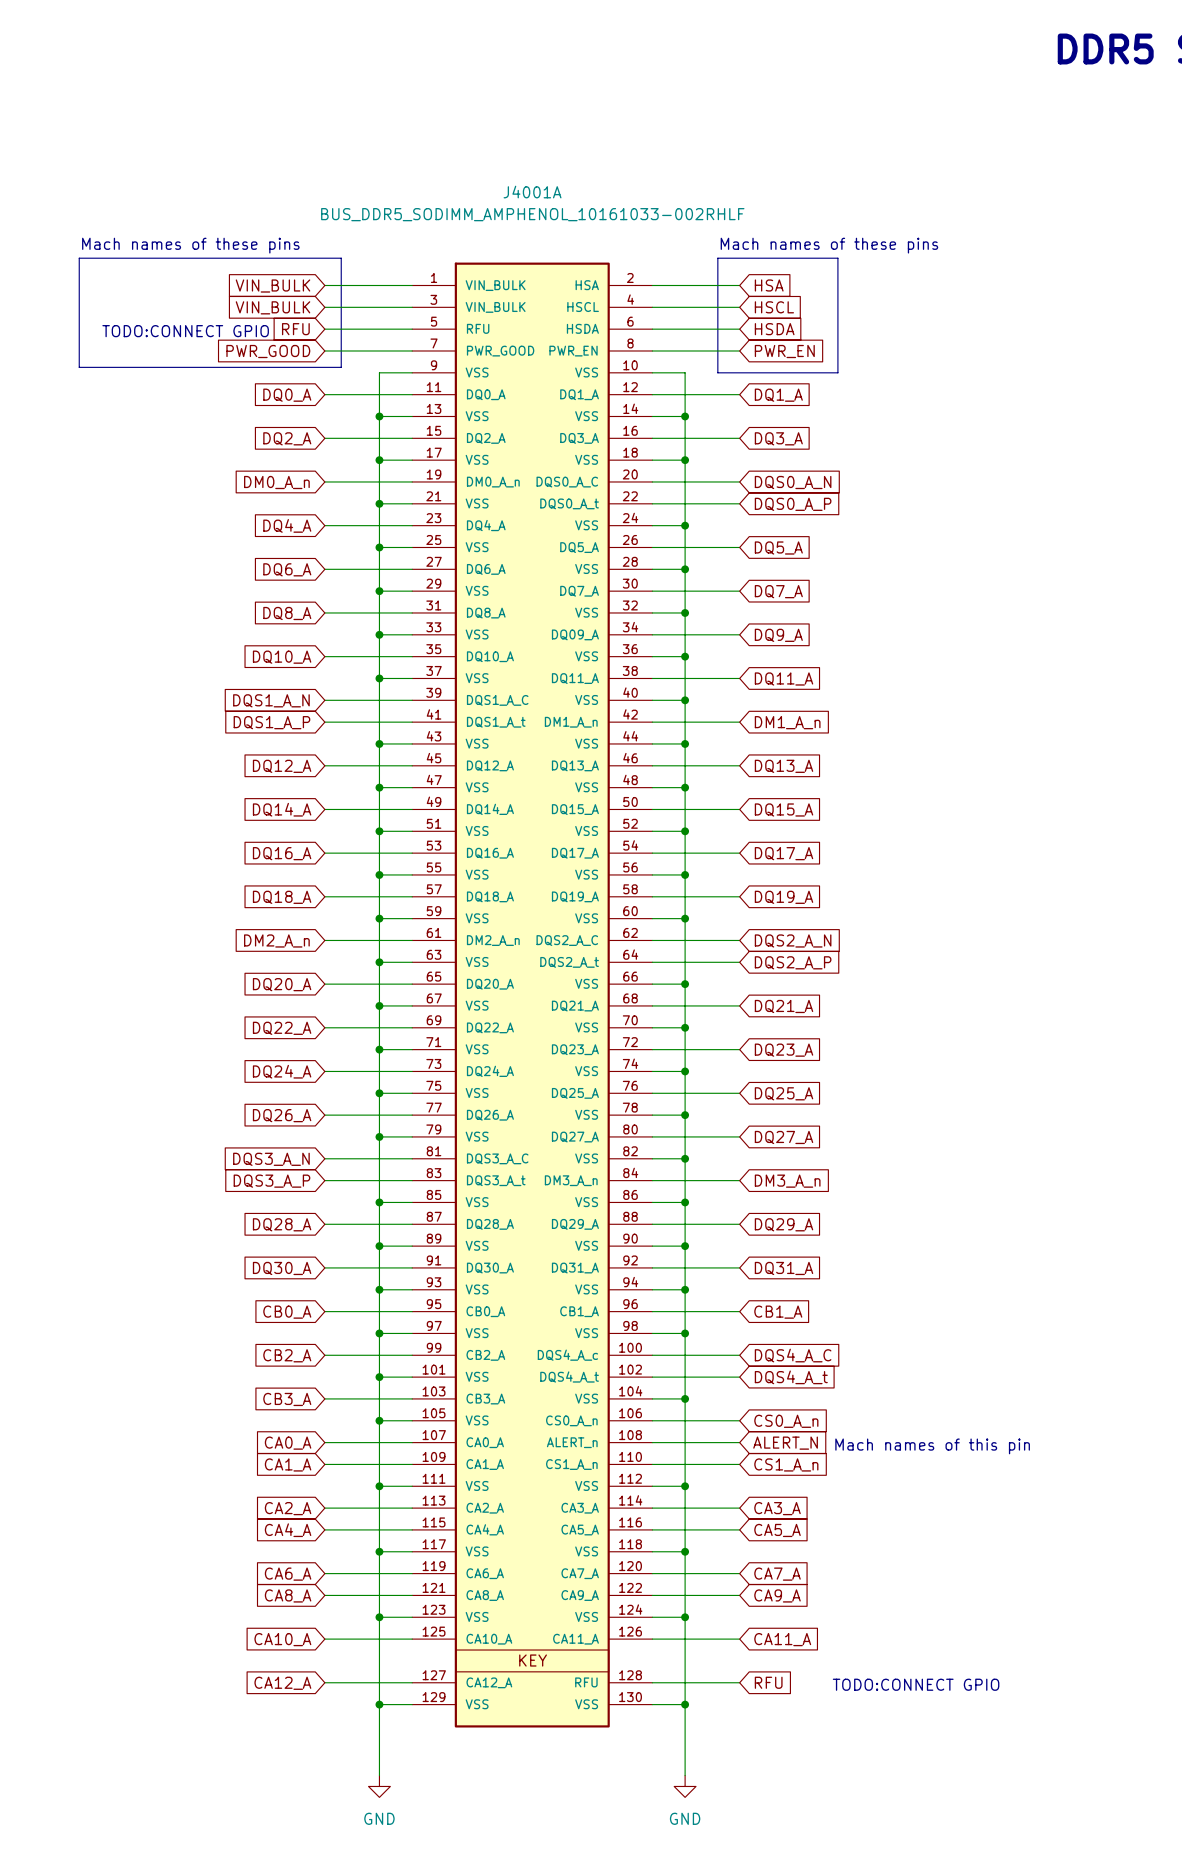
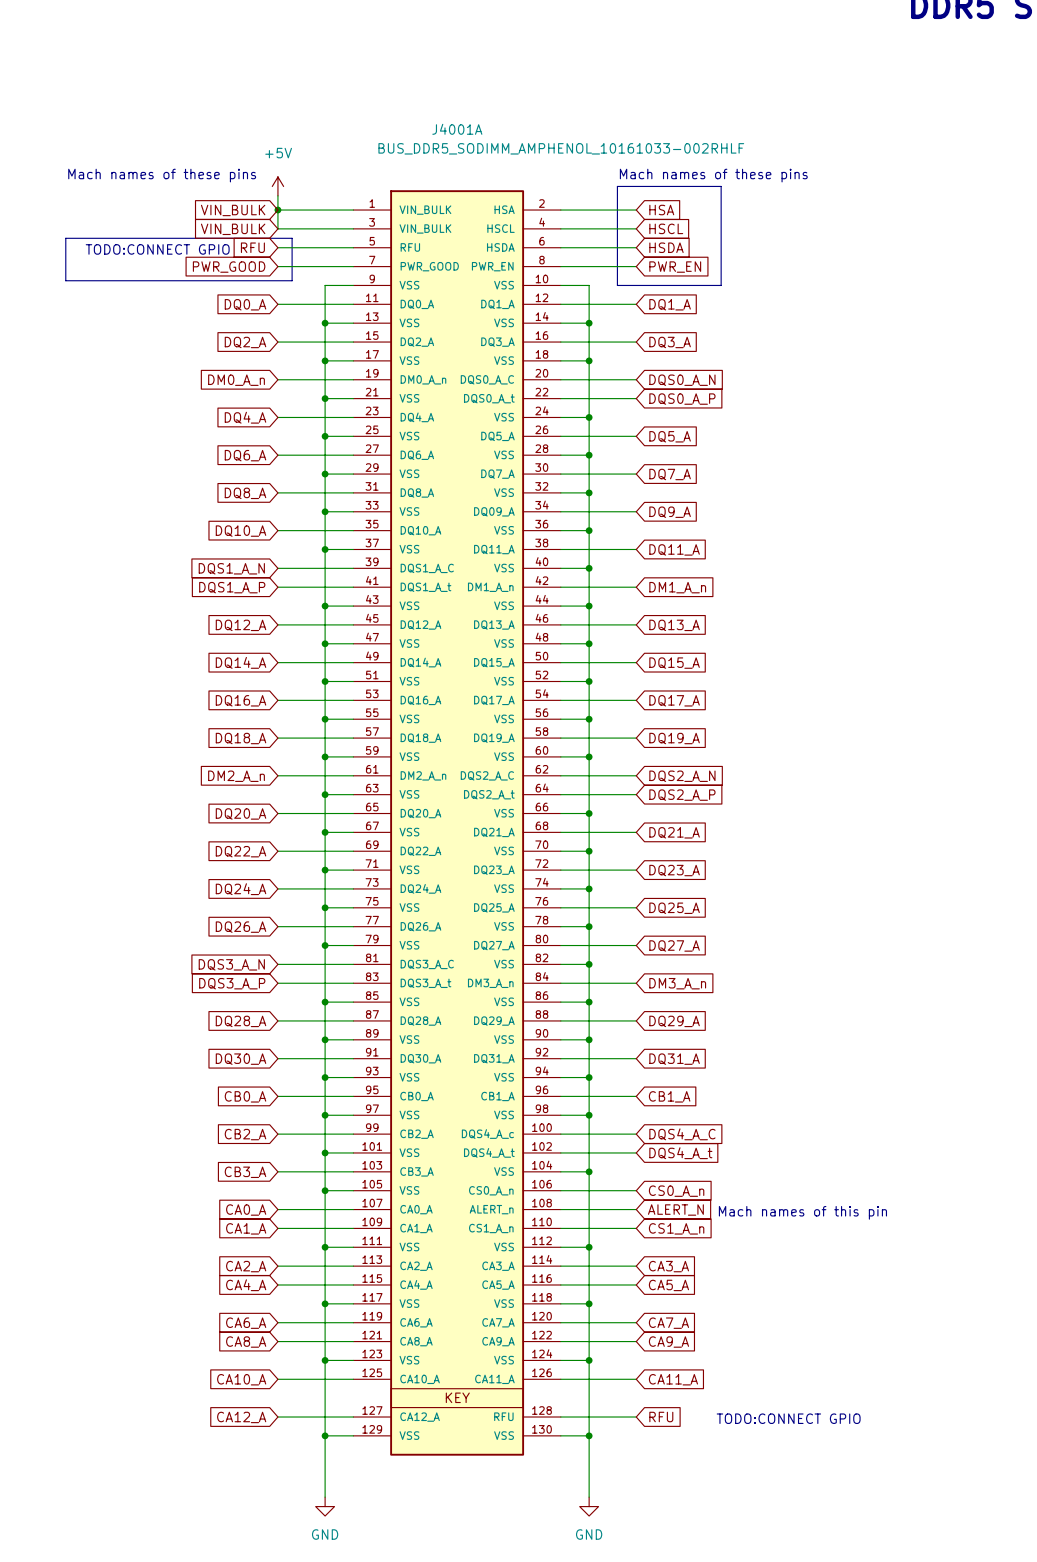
J4001A value position: BUS_DDR5_SODIMM_AMPHENOL_10161033-002RHLF (532, 214) -> BUS_DDR5_SODIMM_AMPHENOL_10161033-002RHLF (561, 148)
power symbol: none -> +5V (277, 186)
wire: none -> (277, 195) (277, 228)
junction: none -> (277, 210)
line: (79, 318) (79, 258) (341, 258) (341, 318) -> (65, 238) (292, 238)

